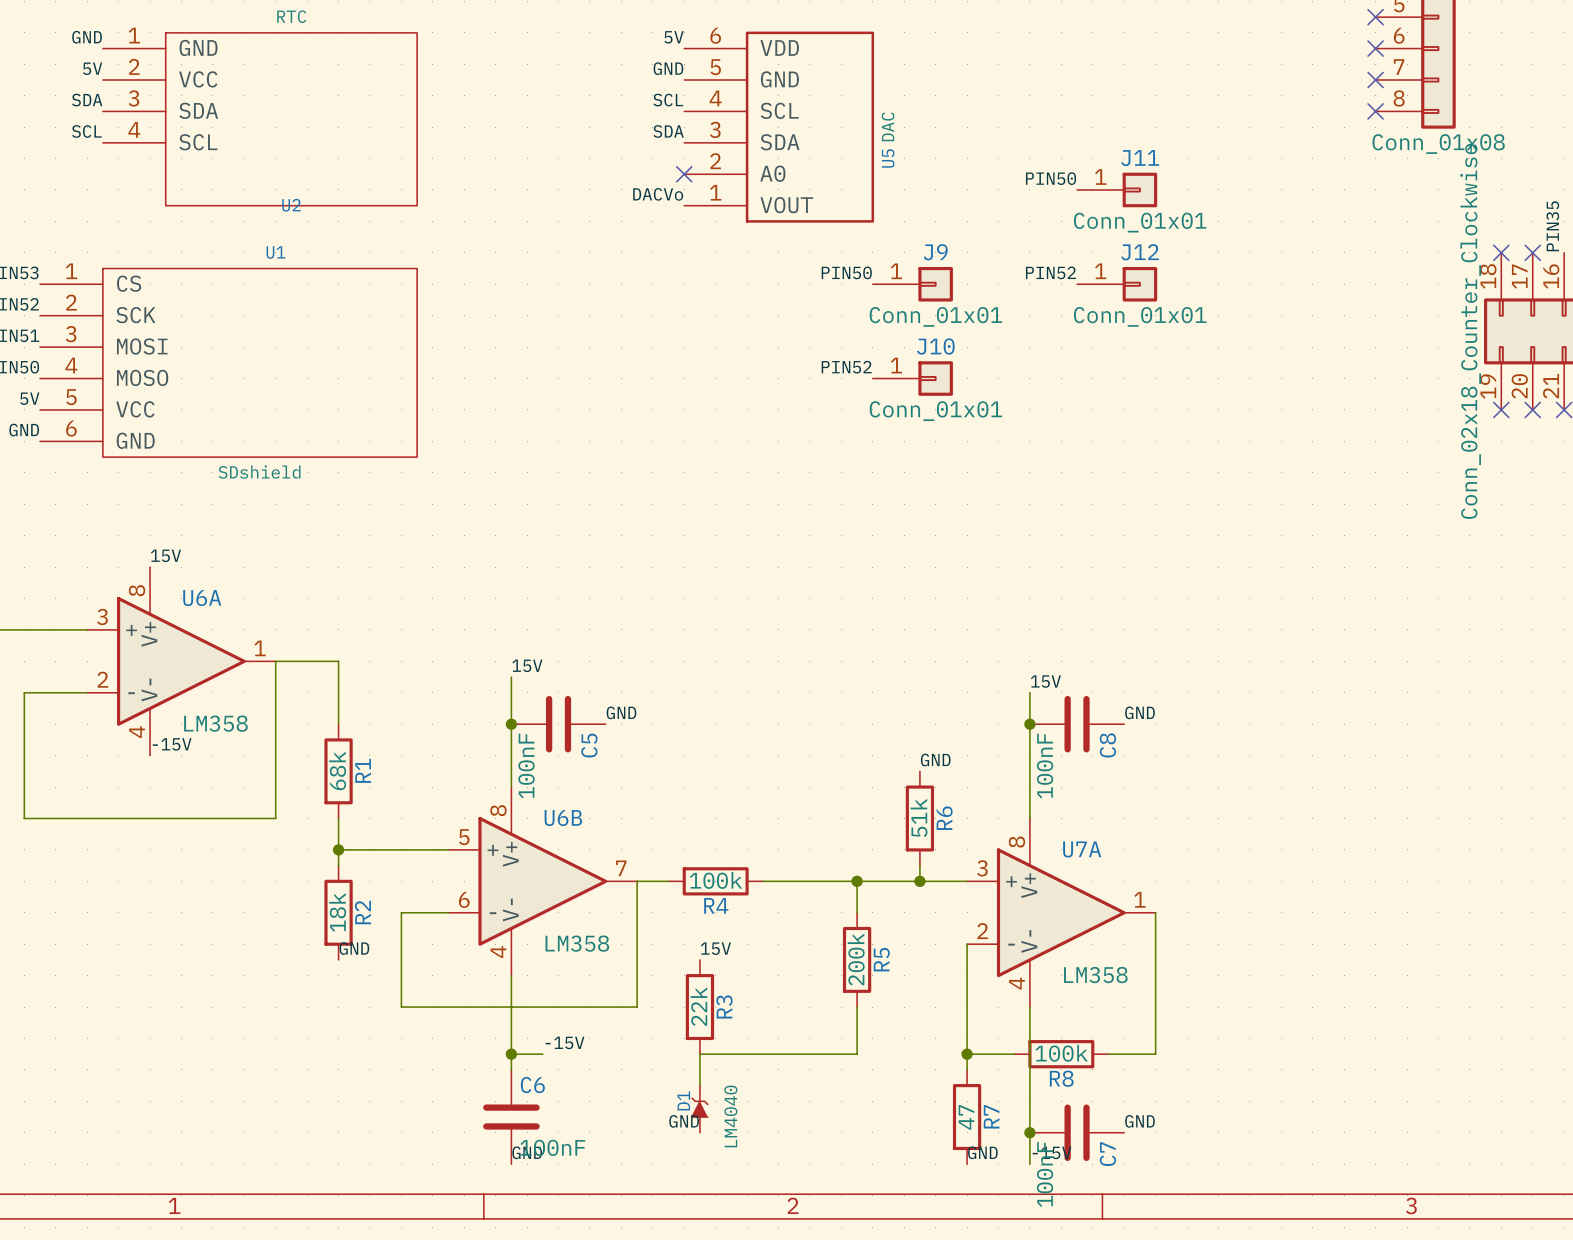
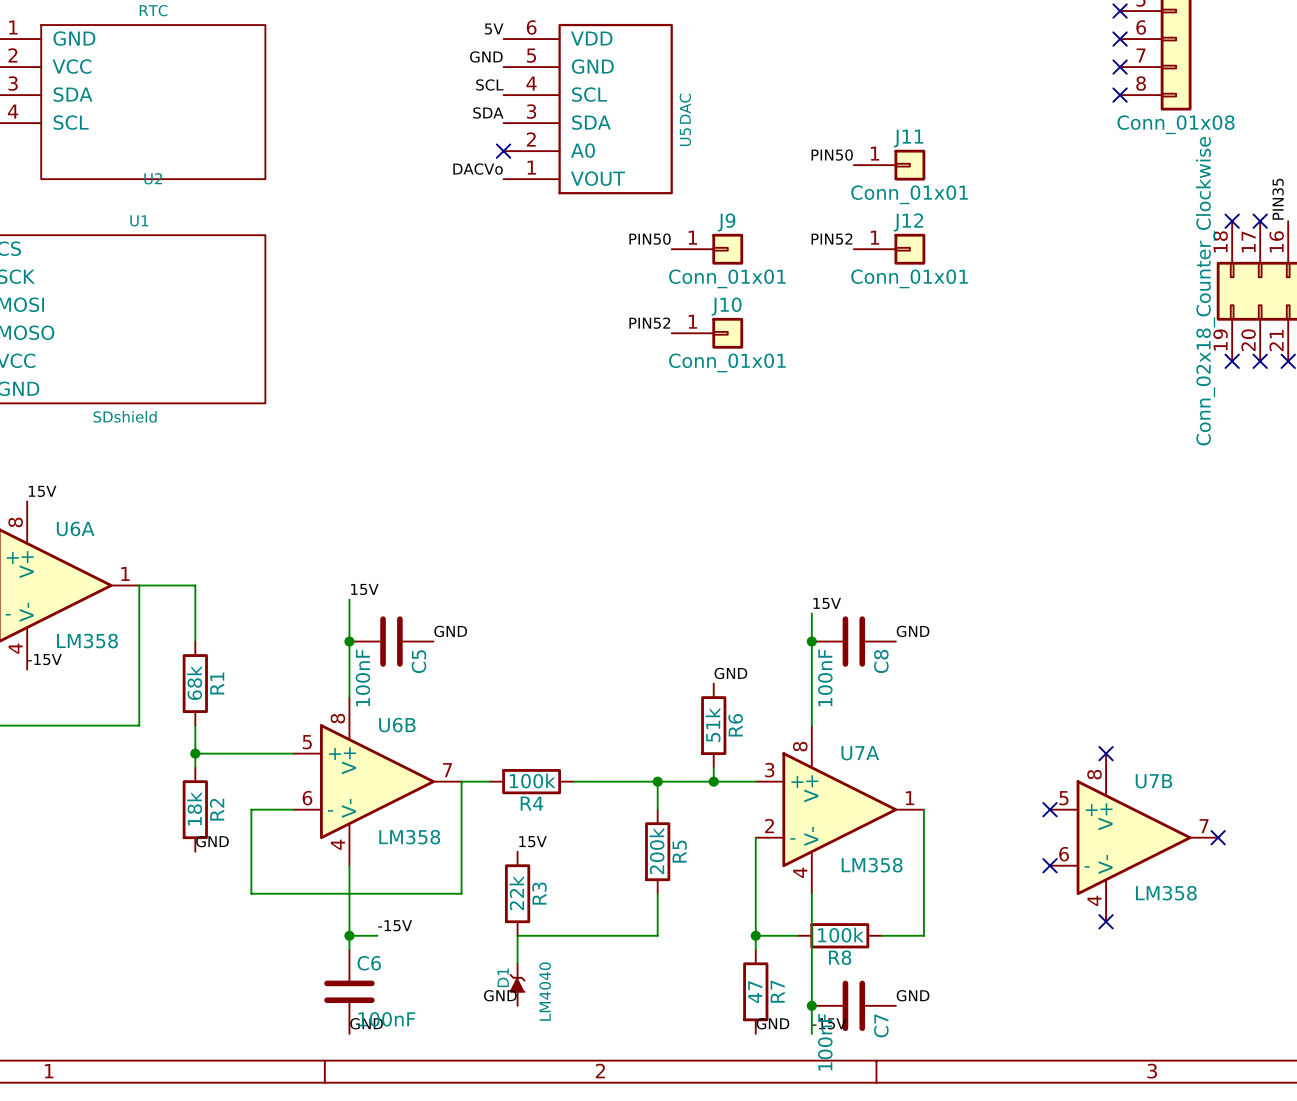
no-connect mark: none -> (1106, 753)
no-connect mark: none -> (1050, 809)
U7B: none -> LM358 (1134, 837)
no-connect mark: none -> (1218, 837)
no-connect mark: none -> (1050, 865)
no-connect mark: none -> (1106, 921)

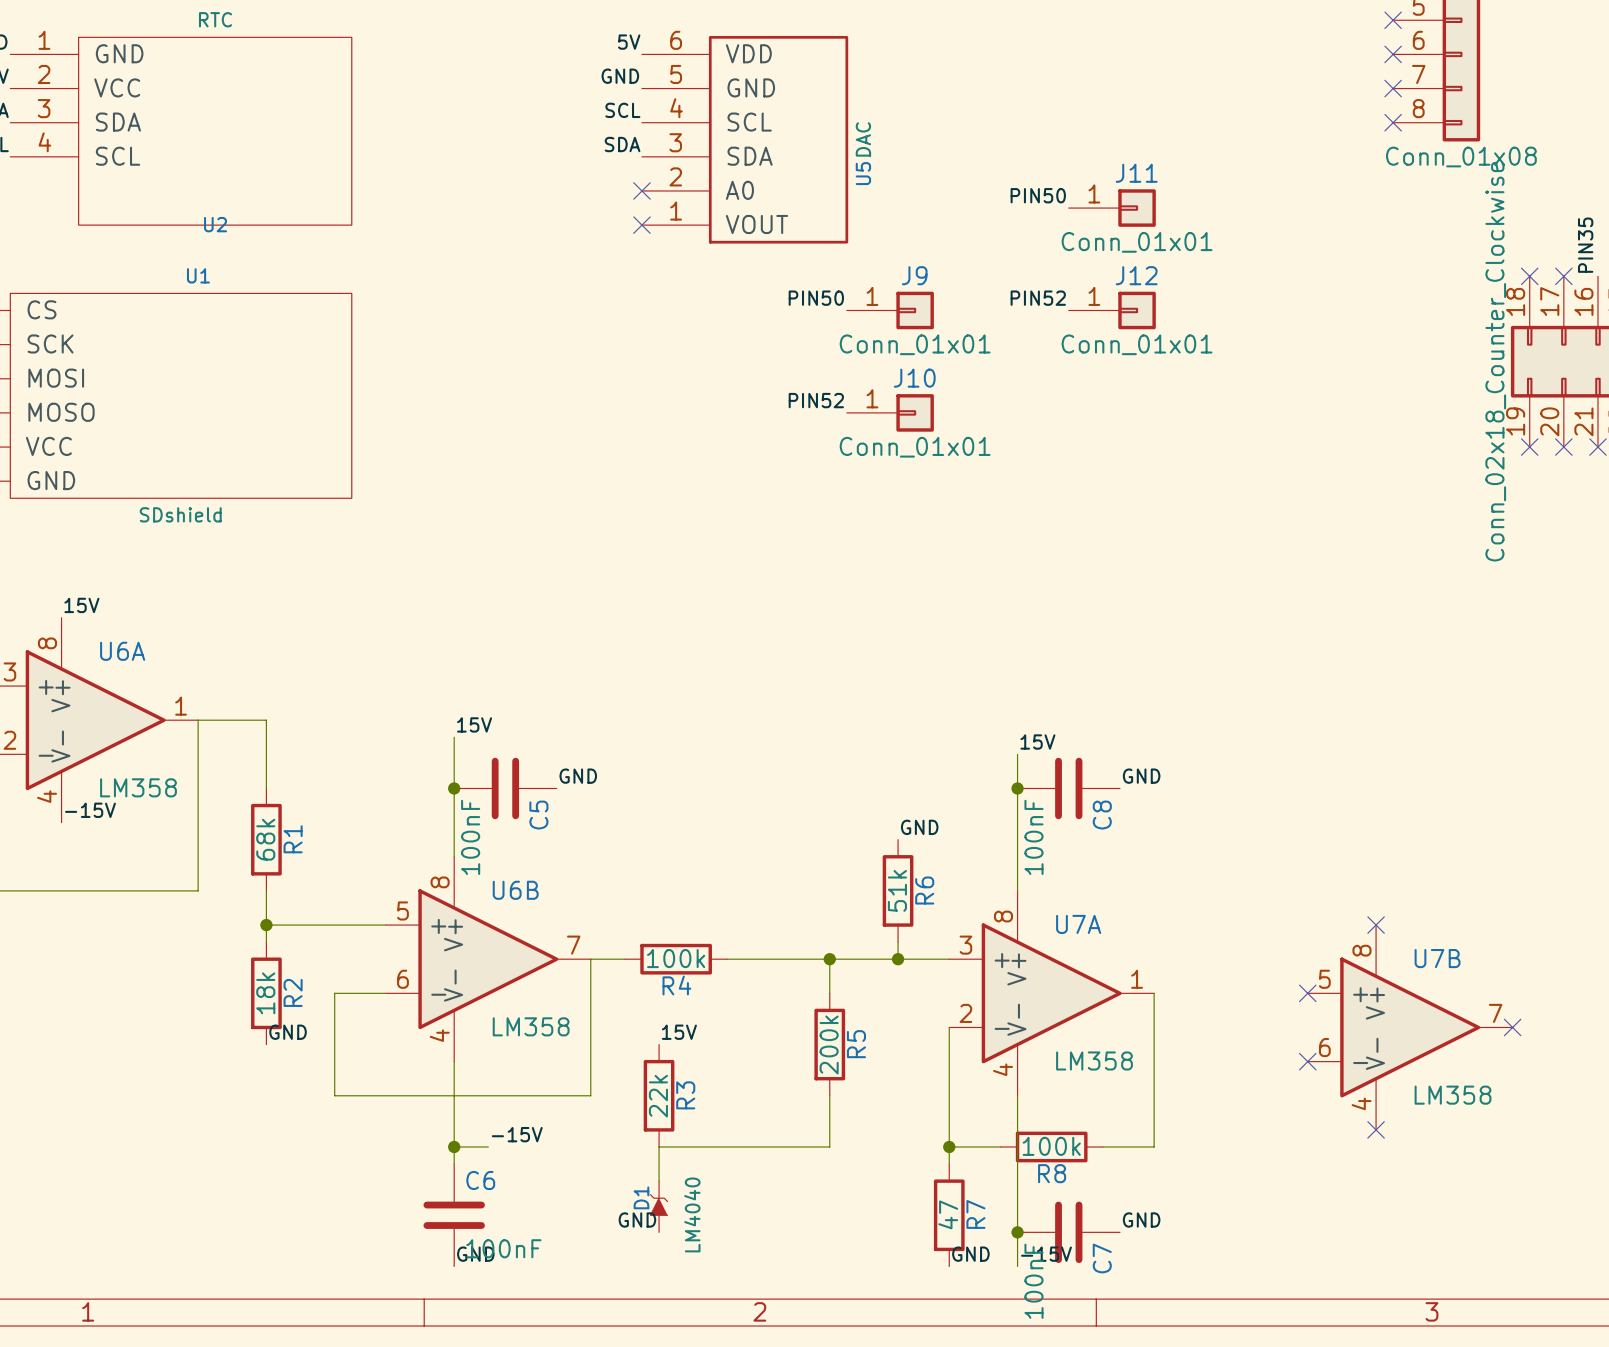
label: DACVo (478, 169) -> none
no-connect mark: none -> (641, 225)

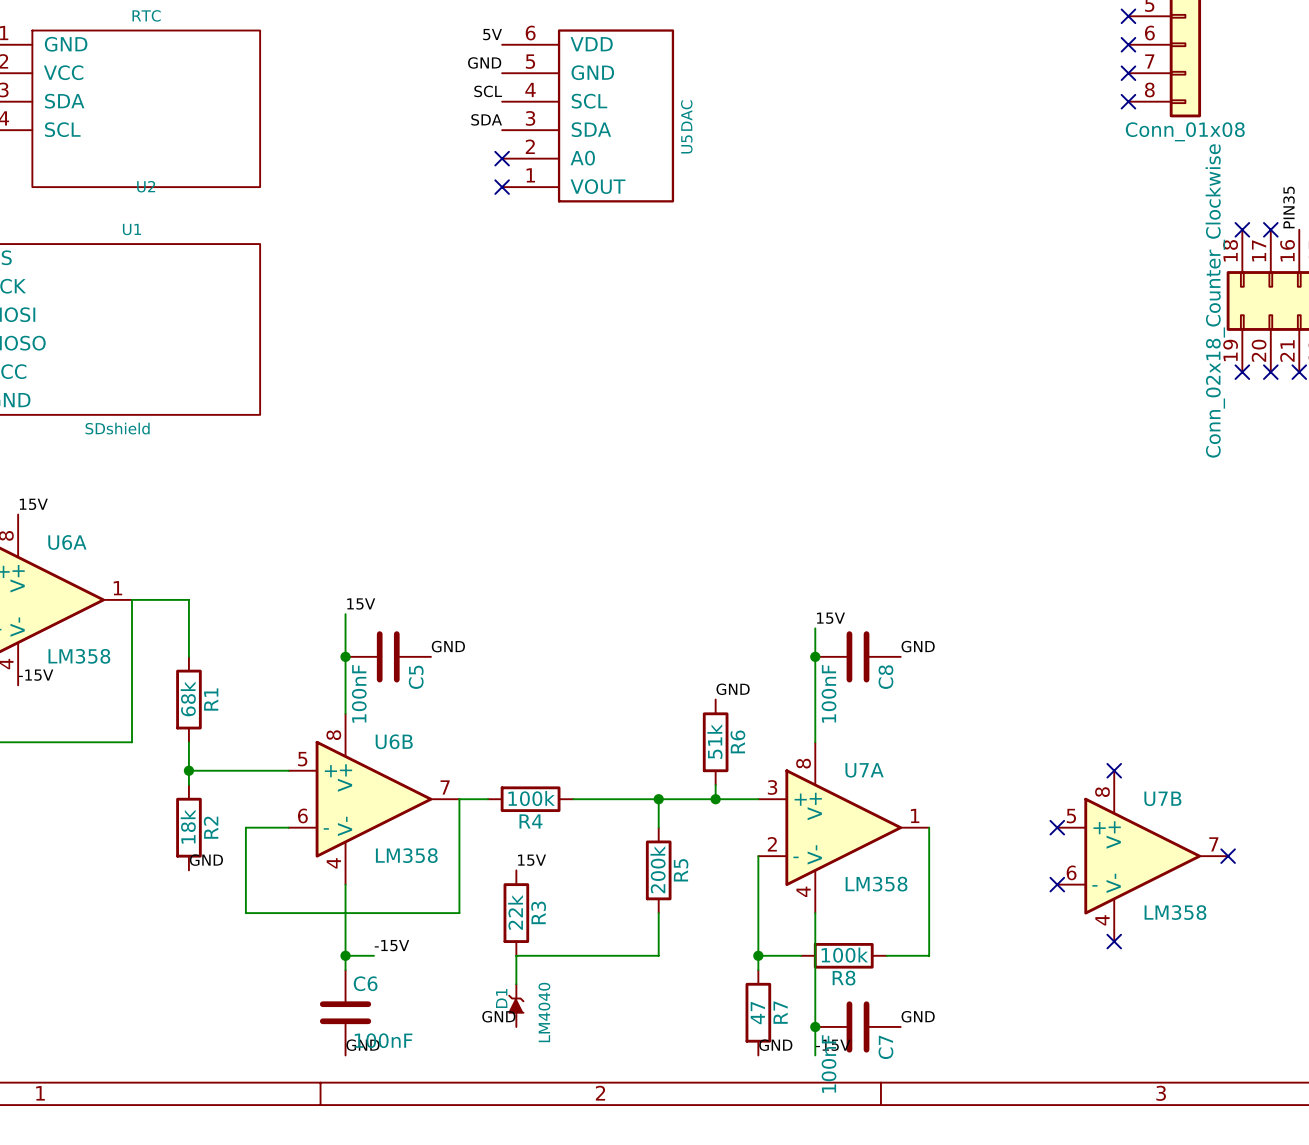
label: PIN50 (1038, 195) -> none
J11: Conn_01x01 (1112, 208) -> none
label: PIN50 (816, 298) -> none
label: PIN52 (1038, 298) -> none
J9: Conn_01x01 (890, 310) -> none
J12: Conn_01x01 (1112, 310) -> none
label: PIN52 (816, 400) -> none
J10: Conn_01x01 (890, 412) -> none

